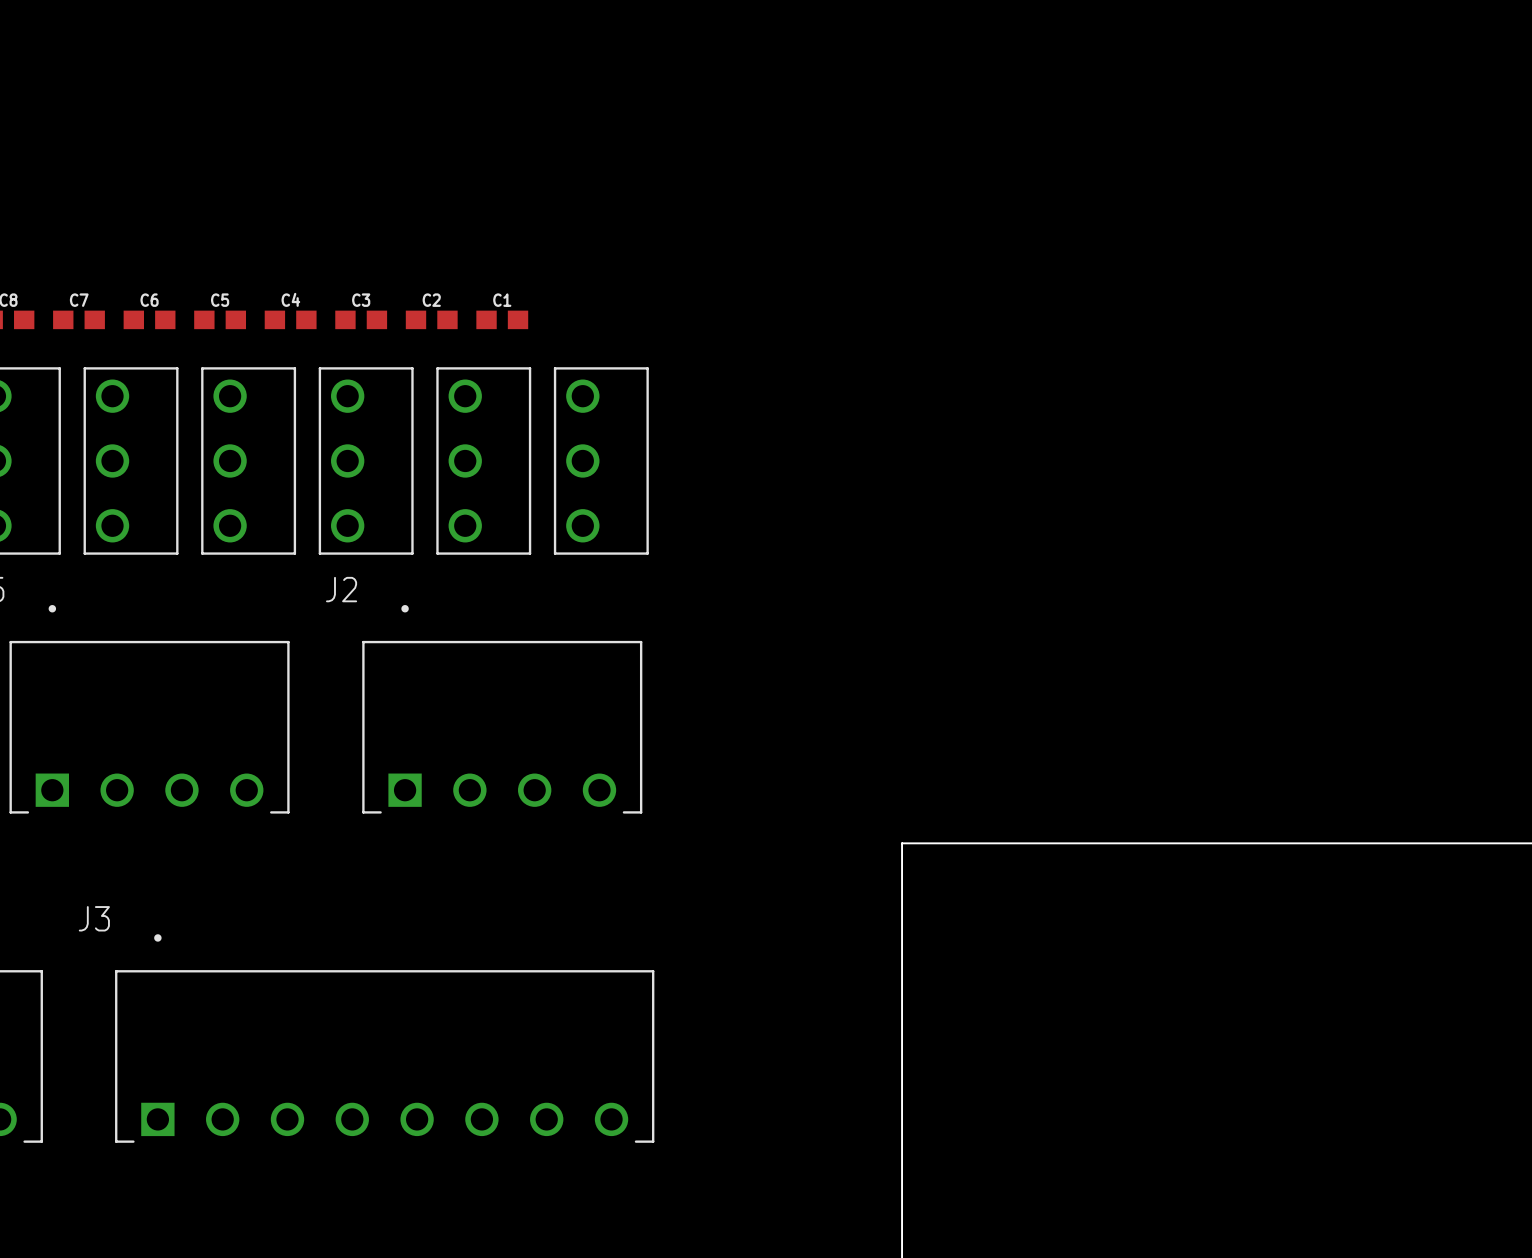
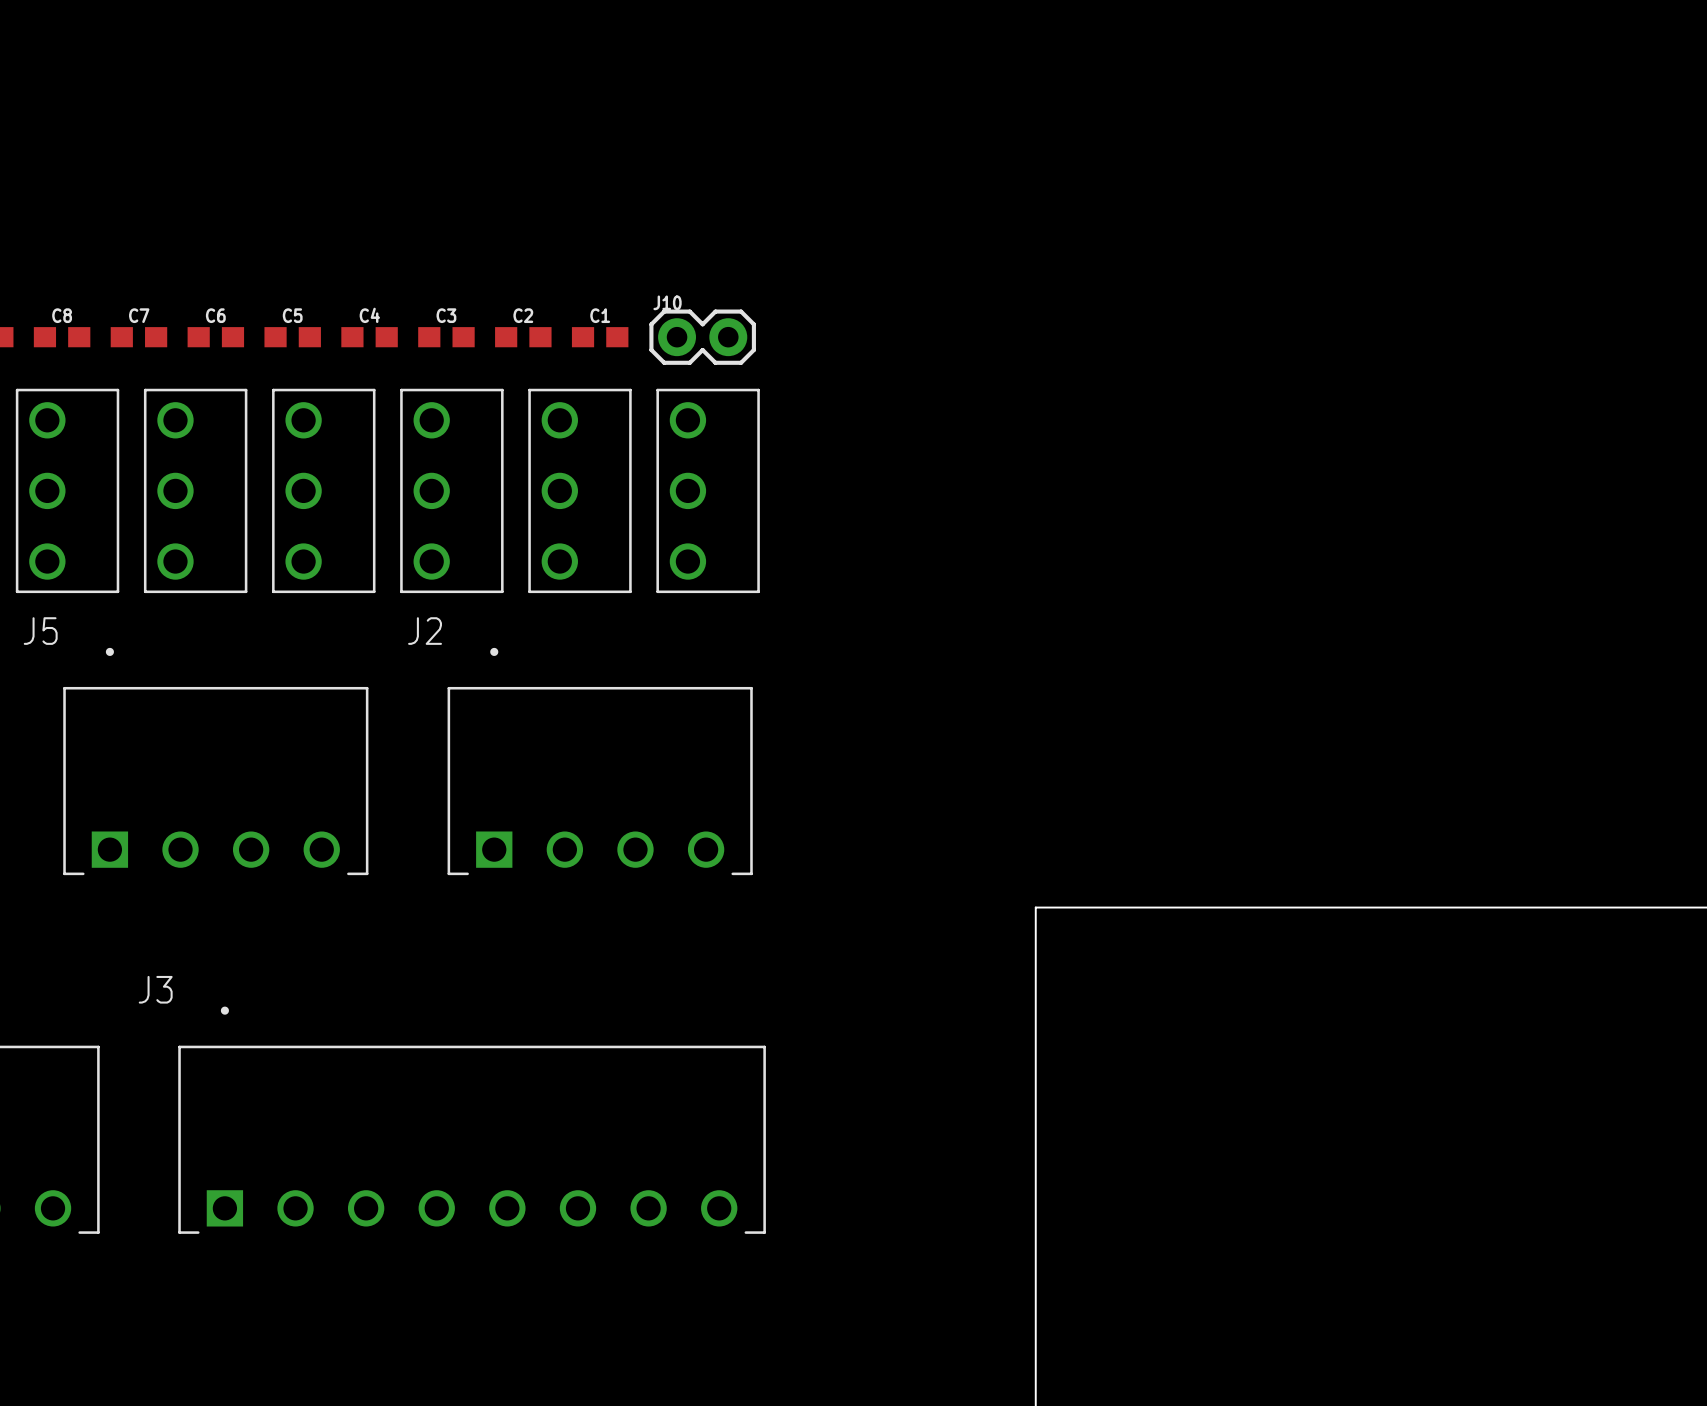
J10: none -> (702, 337)

